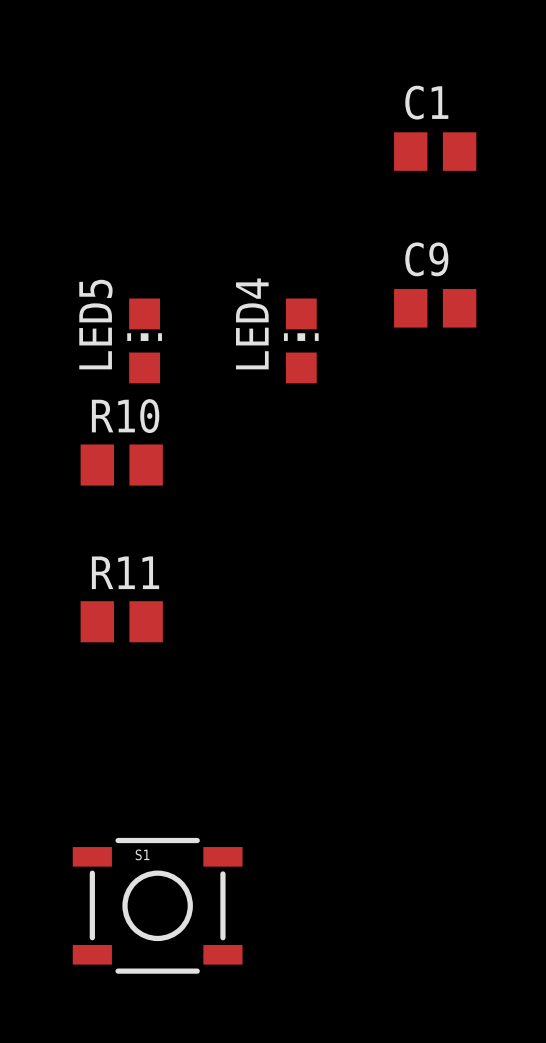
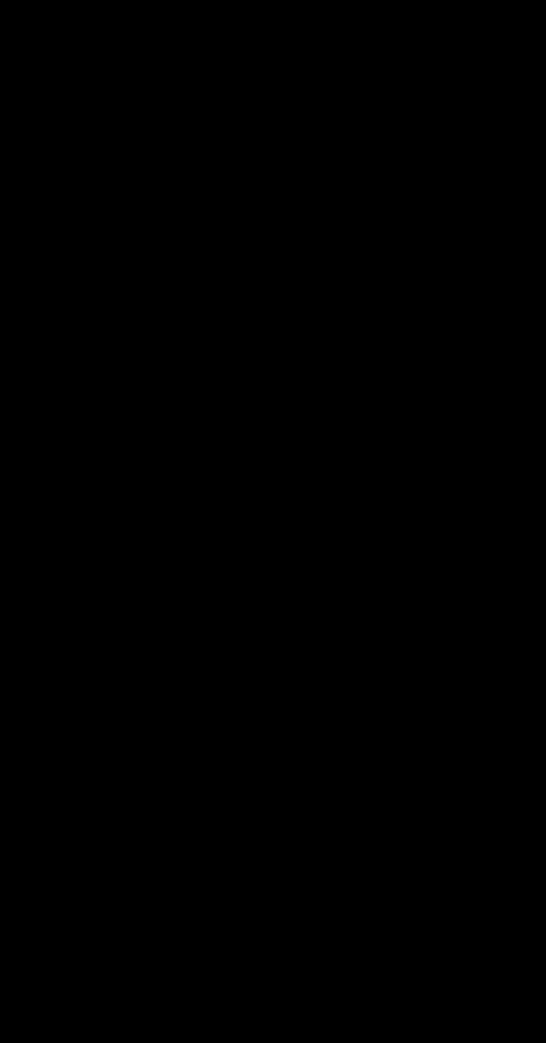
C1: (435, 151) -> none
C9: (435, 308) -> none
LED5: (144, 340) -> none
LED4: (301, 340) -> none
R10: (121, 465) -> none
R11: (121, 621) -> none
S1: (157, 905) -> none

